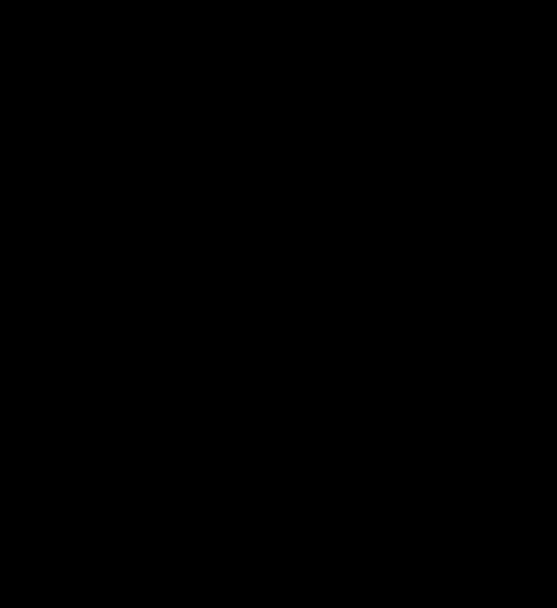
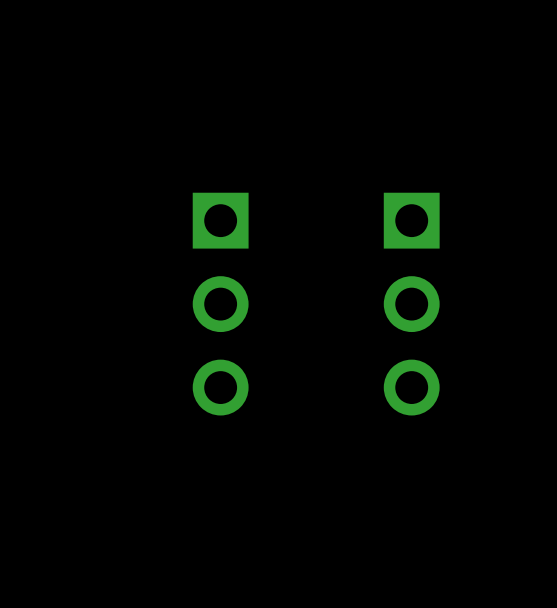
part: none -> (220, 304)
part: none -> (411, 304)

